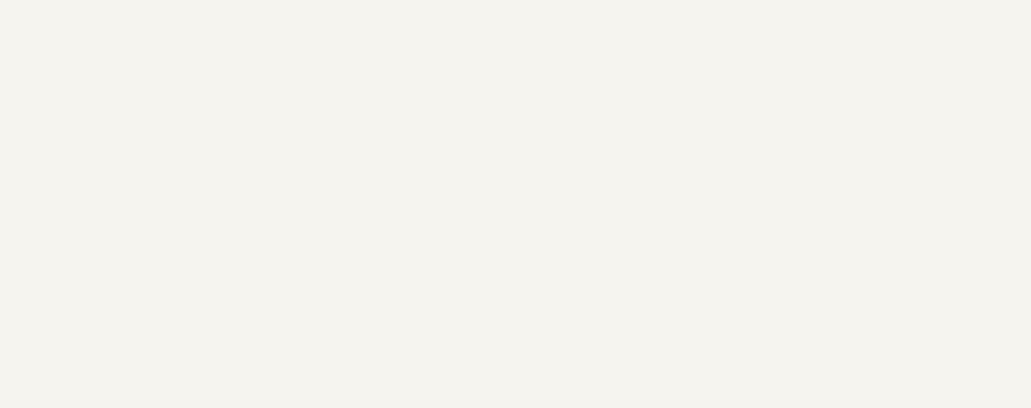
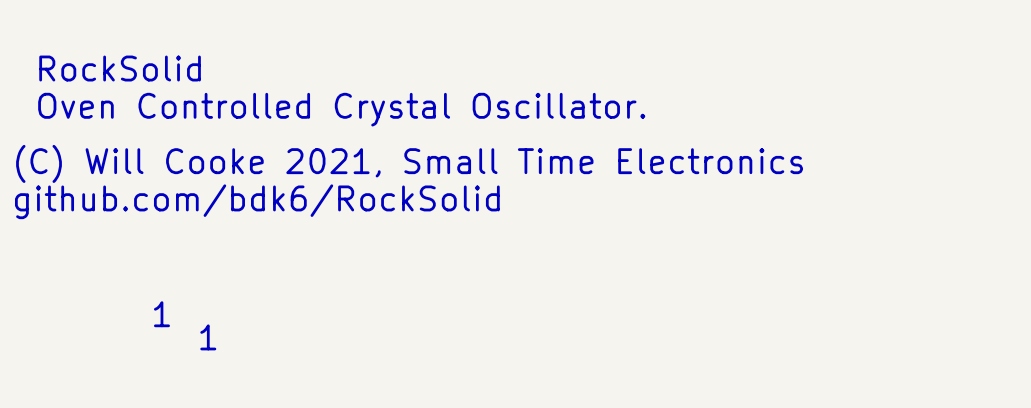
text: none -> RockSolid (120, 68)
text: none -> Oven Controlled Crystal Oscillator. (341, 109)
text: none -> (C) Will Cooke 2021, Small Time Electronics (409, 163)
text: none -> github.com/bdk6/RockSolid (257, 201)
text: none -> 1 (161, 314)
text: none -> 1 (208, 337)

